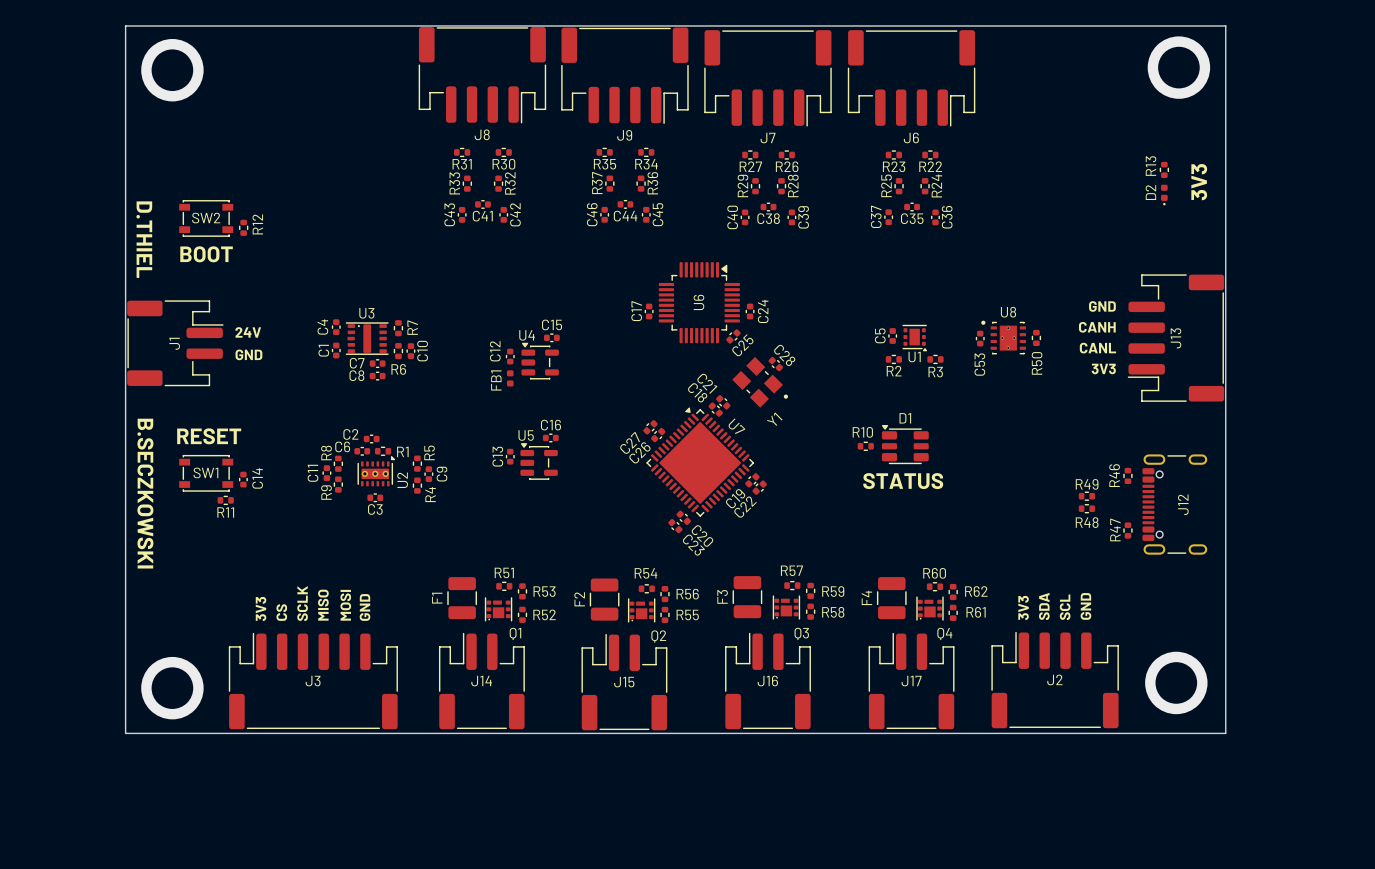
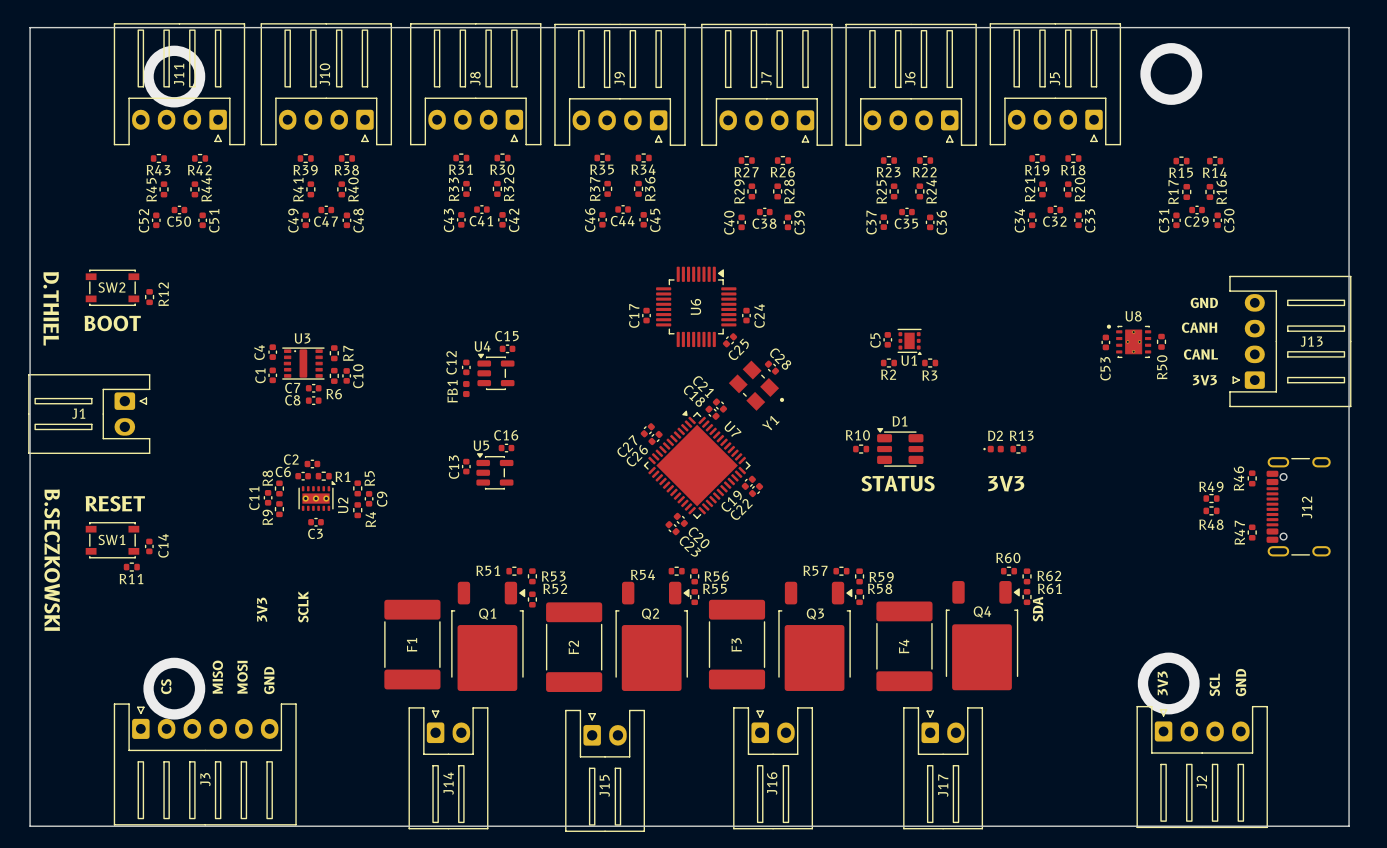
board edge: (125, 25) (1225, 25) (1225, 733) (125, 733) (125, 25) -> (30, 27) (30, 826) (1349, 826) (1349, 27) (30, 27)
J8 footprint: [418, 27, 547, 124] -> [410, 23, 542, 146]
J9 footprint: [561, 27, 689, 124] -> [554, 23, 686, 146]
J7 footprint: [704, 30, 832, 127] -> [701, 23, 833, 146]
J6 footprint: [847, 30, 976, 127] -> [845, 23, 977, 146]
J11: none -> (179, 84)
J10: none -> (326, 84)
J5: none -> (1055, 84)
J8 name position: J8 (482, 134) -> J8 (475, 78)
J9 name position: J9 (624, 135) -> J9 (619, 78)
J6 name position: J6 (911, 137) -> J6 (910, 78)
J7 name position: J7 (768, 138) -> J7 (766, 78)
R43: none -> (158, 158)
R42: none -> (200, 158)
R39: none -> (305, 158)
R38: none -> (346, 158)
R19: none -> (1037, 158)
R18: none -> (1073, 158)
R15: none -> (1181, 161)
R14: none -> (1215, 161)
R13 rotation: 0° (1164, 169) -> 90° clockwise (1018, 449)
R13 position: (1164, 169) -> (1018, 449)
text: 3V3 (1199, 182) -> none
R45: none -> (164, 189)
R44: none -> (194, 189)
R41: none -> (310, 189)
R40: none -> (341, 189)
R21: none -> (1042, 189)
R20: none -> (1068, 189)
R17: none -> (1186, 191)
R16: none -> (1209, 191)
D2 rotation: 0° (1164, 194) -> 90° clockwise (993, 449)
D2 position: (1164, 194) -> (993, 449)
C50: none -> (179, 210)
C47: none -> (326, 210)
C32: none -> (1055, 210)
C29: none -> (1197, 210)
C52: none -> (156, 220)
C51: none -> (202, 220)
C49: none -> (305, 220)
C48: none -> (346, 220)
C34: none -> (1032, 220)
C33: none -> (1078, 220)
C31: none -> (1176, 220)
C30: none -> (1217, 220)
SW2 position: (206, 218) -> (112, 287)
R12 position: (243, 227) -> (149, 297)
text position: D.THIEL (144, 239) -> D.THIEL (51, 308)
text position: BOOT (206, 254) -> BOOT (112, 323)
J13 footprint: [1127, 274, 1225, 402] -> [1229, 275, 1352, 408]
J1 footprint: [127, 300, 224, 387] -> [28, 374, 151, 454]
text position: GND (1102, 306) -> GND (1204, 302)
C4 position: (336, 327) -> (272, 352)
text position: CANH (1097, 327) -> CANH (1199, 327)
R7 position: (398, 328) -> (334, 353)
text: 24V (248, 332) -> none
C15 position: (551, 337) -> (507, 348)
U8 position: (1003, 337) -> (1129, 341)
R50 position: (1036, 337) -> (1161, 341)
U3 position: (367, 338) -> (303, 363)
C53 position: (980, 338) -> (1105, 342)
J13 name position: J13 (1175, 338) -> J13 (1311, 341)
text position: CANL (1097, 348) -> CANL (1200, 354)
C1 position: (336, 350) -> (272, 375)
R6 position: (398, 351) -> (334, 375)
C10 position: (410, 351) -> (346, 375)
text: GND (248, 354) -> none
C12 position: (510, 356) -> (466, 367)
U4 position: (540, 361) -> (495, 371)
C7 position: (377, 363) -> (313, 388)
text: 3V3 (1103, 368) -> none
C8 position: (377, 376) -> (313, 400)
text: none -> 3V3 (1204, 380)
FB1 position: (510, 378) -> (466, 389)
text position: RESET (209, 436) -> RESET (115, 503)
C16 position: (550, 437) -> (506, 448)
C2 position: (371, 439) -> (312, 464)
C6 position: (362, 451) -> (303, 476)
R1 position: (383, 451) -> (323, 476)
C13 position: (510, 456) -> (466, 466)
U5 position: (539, 461) -> (494, 471)
R8 position: (338, 463) -> (279, 488)
R5 position: (417, 463) -> (357, 488)
U2 position: (376, 471) -> (317, 495)
SW1 position: (206, 473) -> (112, 540)
C11 position: (326, 473) -> (268, 497)
C9 position: (428, 474) -> (369, 498)
R46 position: (1127, 475) -> (1252, 478)
C14 position: (243, 479) -> (149, 546)
text: none -> 3V3 (1006, 483)
R9 position: (338, 484) -> (279, 509)
R4 position: (417, 485) -> (357, 510)
text position: B.SECZKOWSKI (145, 493) -> B.SECZKOWSKI (52, 560)
R49 position: (1086, 496) -> (1211, 498)
C3 position: (375, 497) -> (316, 522)
R11 position: (225, 500) -> (131, 567)
J12 position: (1174, 504) -> (1298, 506)
R48 position: (1086, 508) -> (1211, 510)
R47 position: (1127, 530) -> (1252, 532)
R57 name position: R57 (791, 570) -> R57 (815, 570)
R51 name position: R51 (504, 572) -> R51 (488, 570)
F3 footprint: [732, 576, 763, 619] -> [708, 599, 766, 690]
F1 footprint: [447, 577, 477, 620] -> [384, 599, 441, 690]
F4 footprint: [877, 577, 907, 620] -> [876, 601, 933, 692]
F2 footprint: [589, 578, 620, 621] -> [546, 602, 603, 693]
R57 position: (792, 585) -> (841, 571)
R51 position: (504, 586) -> (514, 571)
R60 position: (934, 586) -> (1008, 571)
R54 position: (646, 588) -> (676, 571)
R59 position: (810, 590) -> (859, 576)
R53 position: (522, 591) -> (532, 576)
R62 position: (953, 592) -> (1027, 576)
R56 position: (665, 594) -> (694, 576)
Q3 footprint: [772, 595, 801, 620] -> [778, 581, 853, 691]
F3 name position: F3 (722, 596) -> F3 (736, 644)
Q4 footprint: [916, 596, 944, 621] -> [945, 581, 1020, 691]
Q1 footprint: [484, 597, 513, 622] -> [451, 581, 526, 691]
F4 name position: F4 (866, 597) -> F4 (904, 646)
F1 name position: F1 (437, 598) -> F1 (412, 644)
Q2 footprint: [628, 598, 656, 623] -> [615, 581, 690, 691]
F2 name position: F2 (579, 599) -> F2 (573, 647)
text position: MISO (323, 605) -> MISO (217, 677)
text position: MOSI (345, 605) -> MOSI (242, 677)
text: GND (1085, 606) -> none
text position: GND (365, 607) -> GND (269, 680)
text: 3V3 (1023, 607) -> none
text position: SCL (1065, 607) -> SCL (1214, 684)
R58 position: (810, 611) -> (859, 597)
text position: CS (281, 612) -> CS (166, 686)
R58 name position: R58 (833, 612) -> R58 (880, 588)
R61 position: (953, 612) -> (1027, 597)
R61 name position: R61 (976, 612) -> R61 (1049, 588)
R52 position: (522, 614) -> (532, 599)
R52 name position: R52 (544, 614) -> R52 (555, 588)
R55 position: (665, 614) -> (694, 597)
R55 name position: R55 (687, 614) -> R55 (714, 588)
J2 footprint: [991, 631, 1119, 729] -> [1136, 706, 1268, 829]
J3 footprint: [228, 632, 398, 730] -> [113, 703, 297, 826]
J14 footprint: [439, 632, 525, 730] -> [408, 707, 489, 830]
J16 footprint: [725, 632, 811, 730] -> [733, 707, 813, 830]
J17 footprint: [868, 632, 955, 730] -> [903, 707, 983, 830]
Q1 name position: Q1 (515, 633) -> Q1 (487, 614)
J15 footprint: [581, 633, 668, 731] -> [565, 709, 645, 832]
Q3 name position: Q3 (801, 633) -> Q3 (815, 614)
Q4 name position: Q4 (944, 633) -> Q4 (982, 611)
Q2 name position: Q2 (658, 636) -> Q2 (650, 614)
text: none -> GND (1241, 682)
text: none -> 3V3 (1162, 683)

